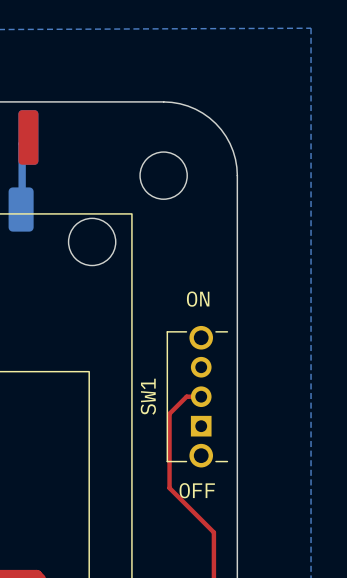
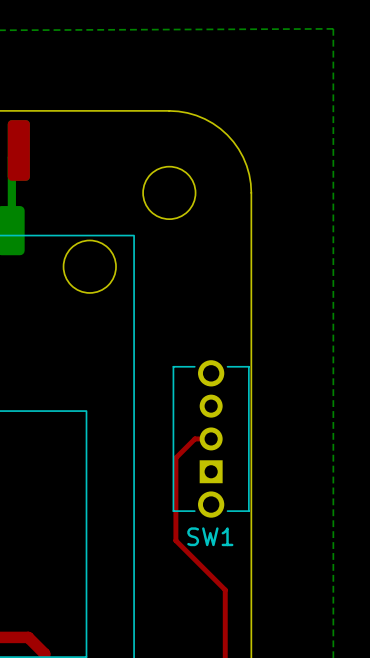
text: ON (198, 299) -> none
SW1 footprint: [166, 325, 229, 468] -> [172, 360, 250, 518]
SW1 name position: SW1 (148, 396) -> SW1 (210, 536)
text: OFF (197, 490) -> none

